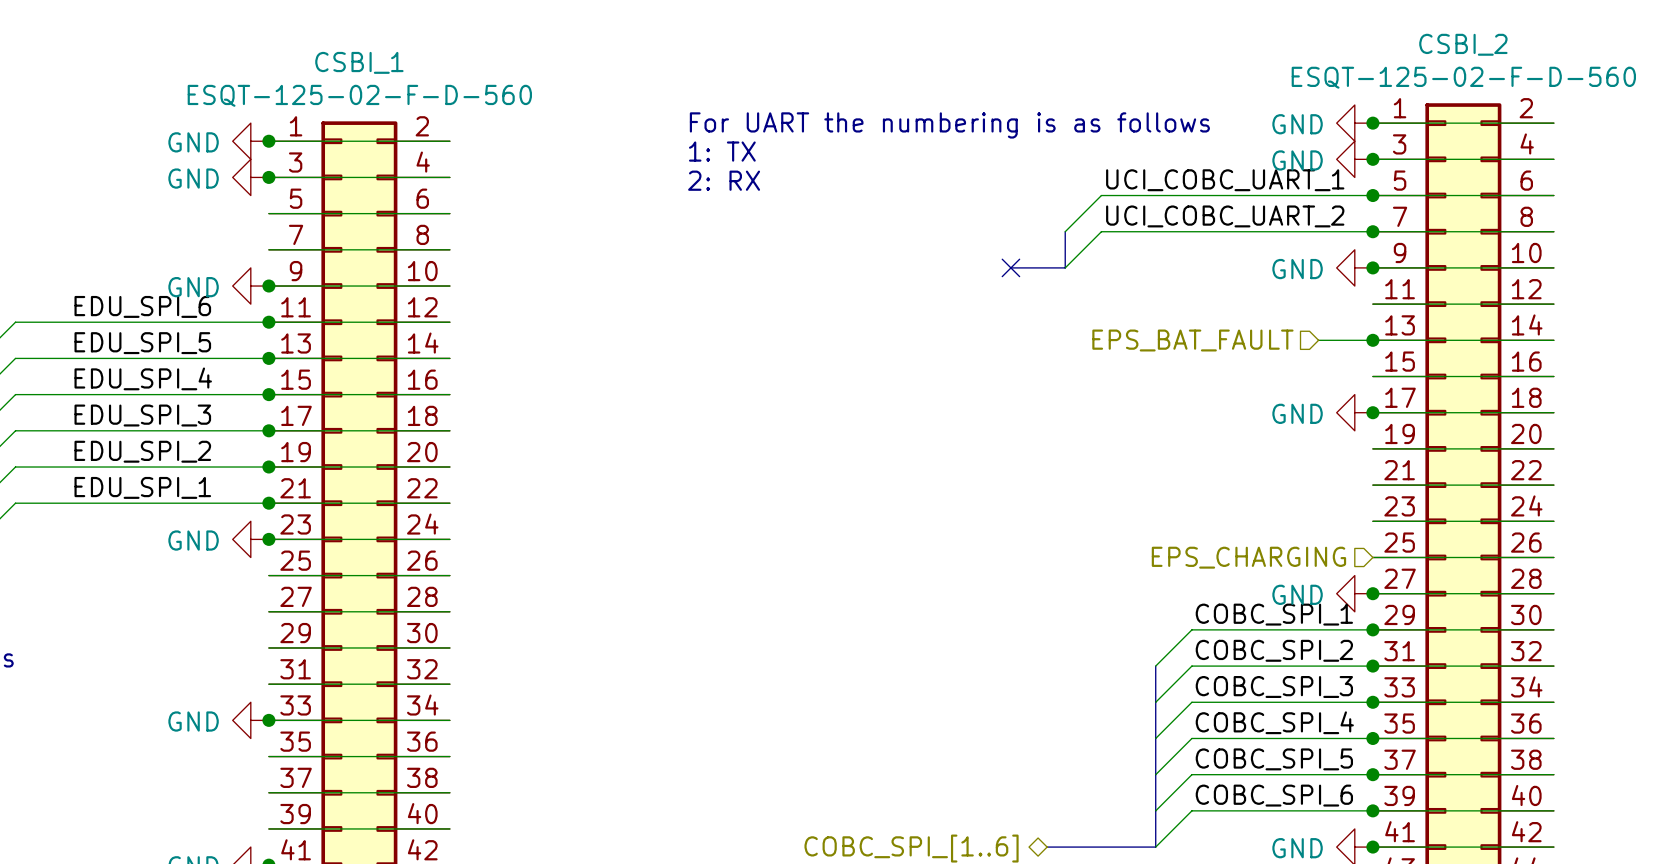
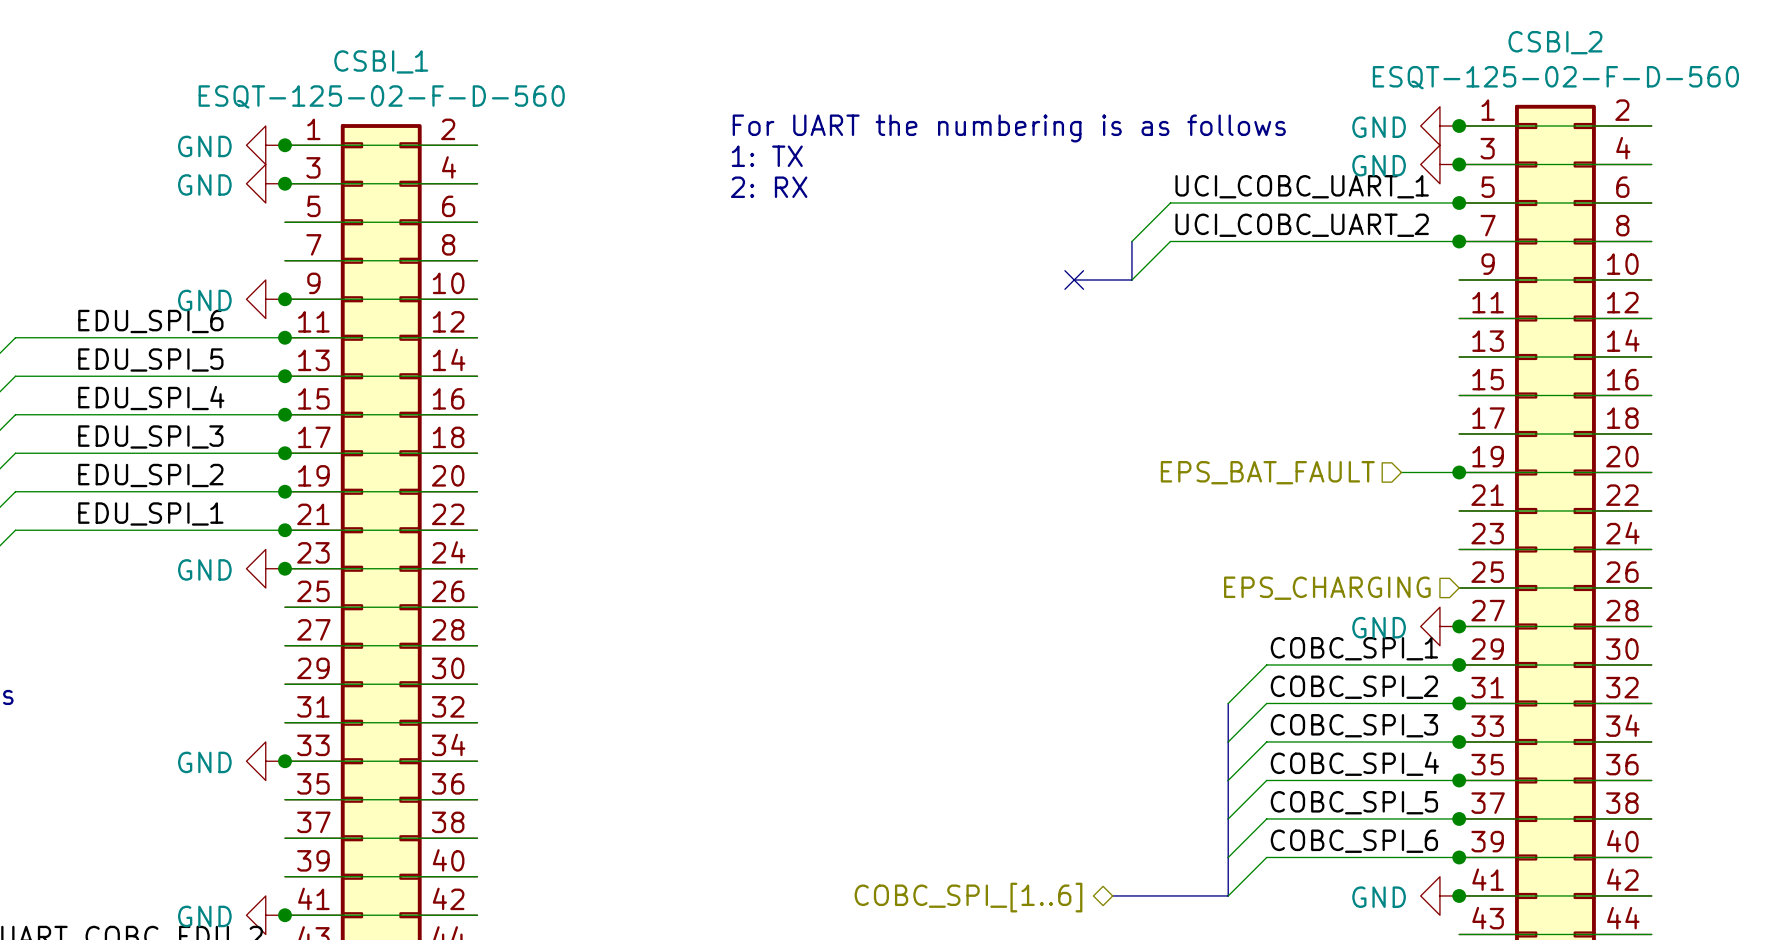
power symbol: GND (1354, 267) -> none
junction: (1372, 267) -> none
hierarchical label position: EPS_BAT_FAULT (1192, 340) -> EPS_BAT_FAULT (1267, 472)
wire: (1318, 340) (1372, 340) -> (1401, 472) (1459, 472)
junction: (1372, 340) -> none
power symbol: GND (1354, 412) -> none
junction position: (1372, 412) -> (1459, 472)

